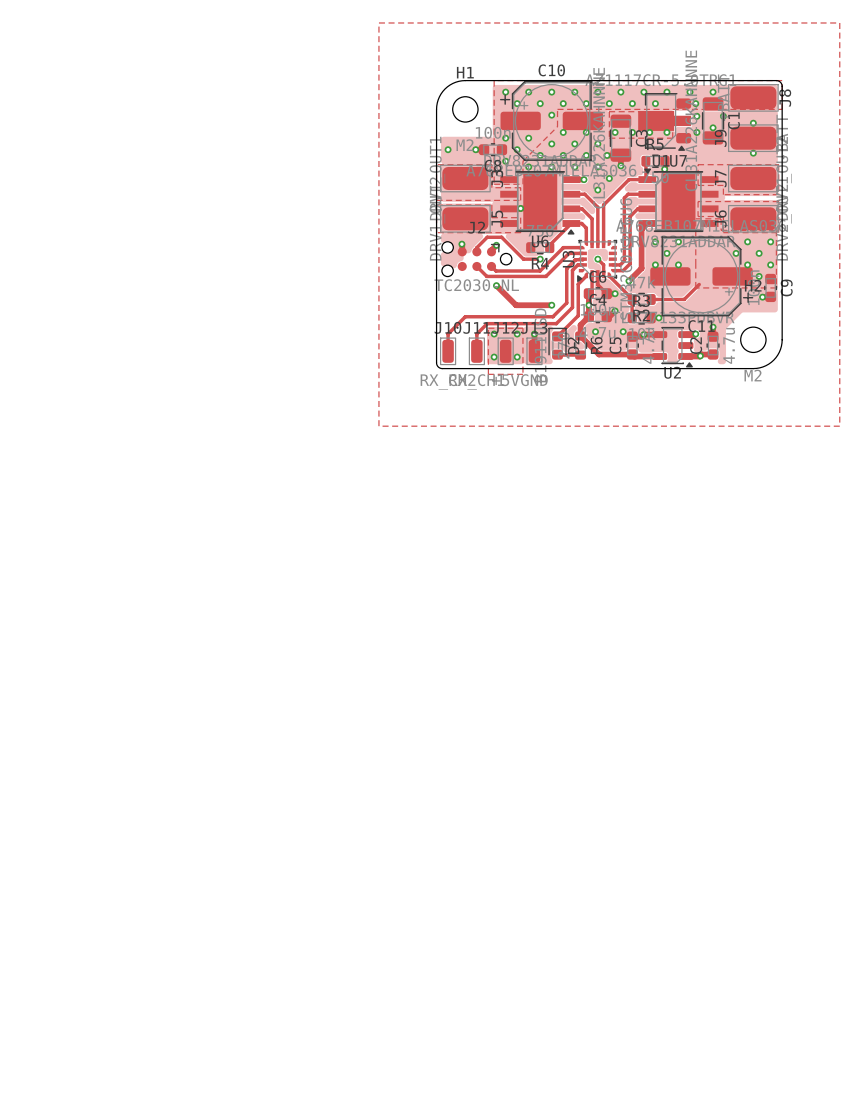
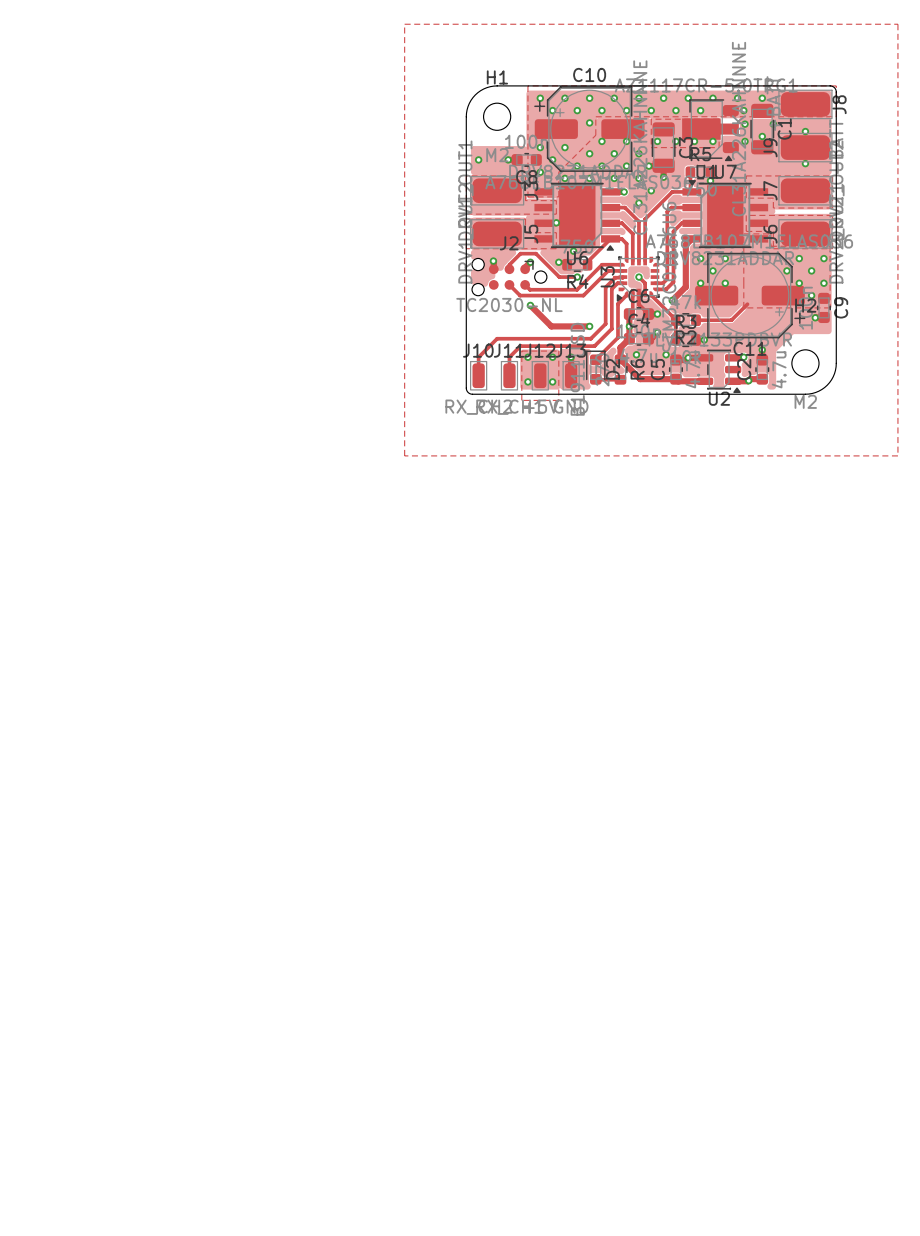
via: none -> (573, 251)
via: none -> (558, 262)

